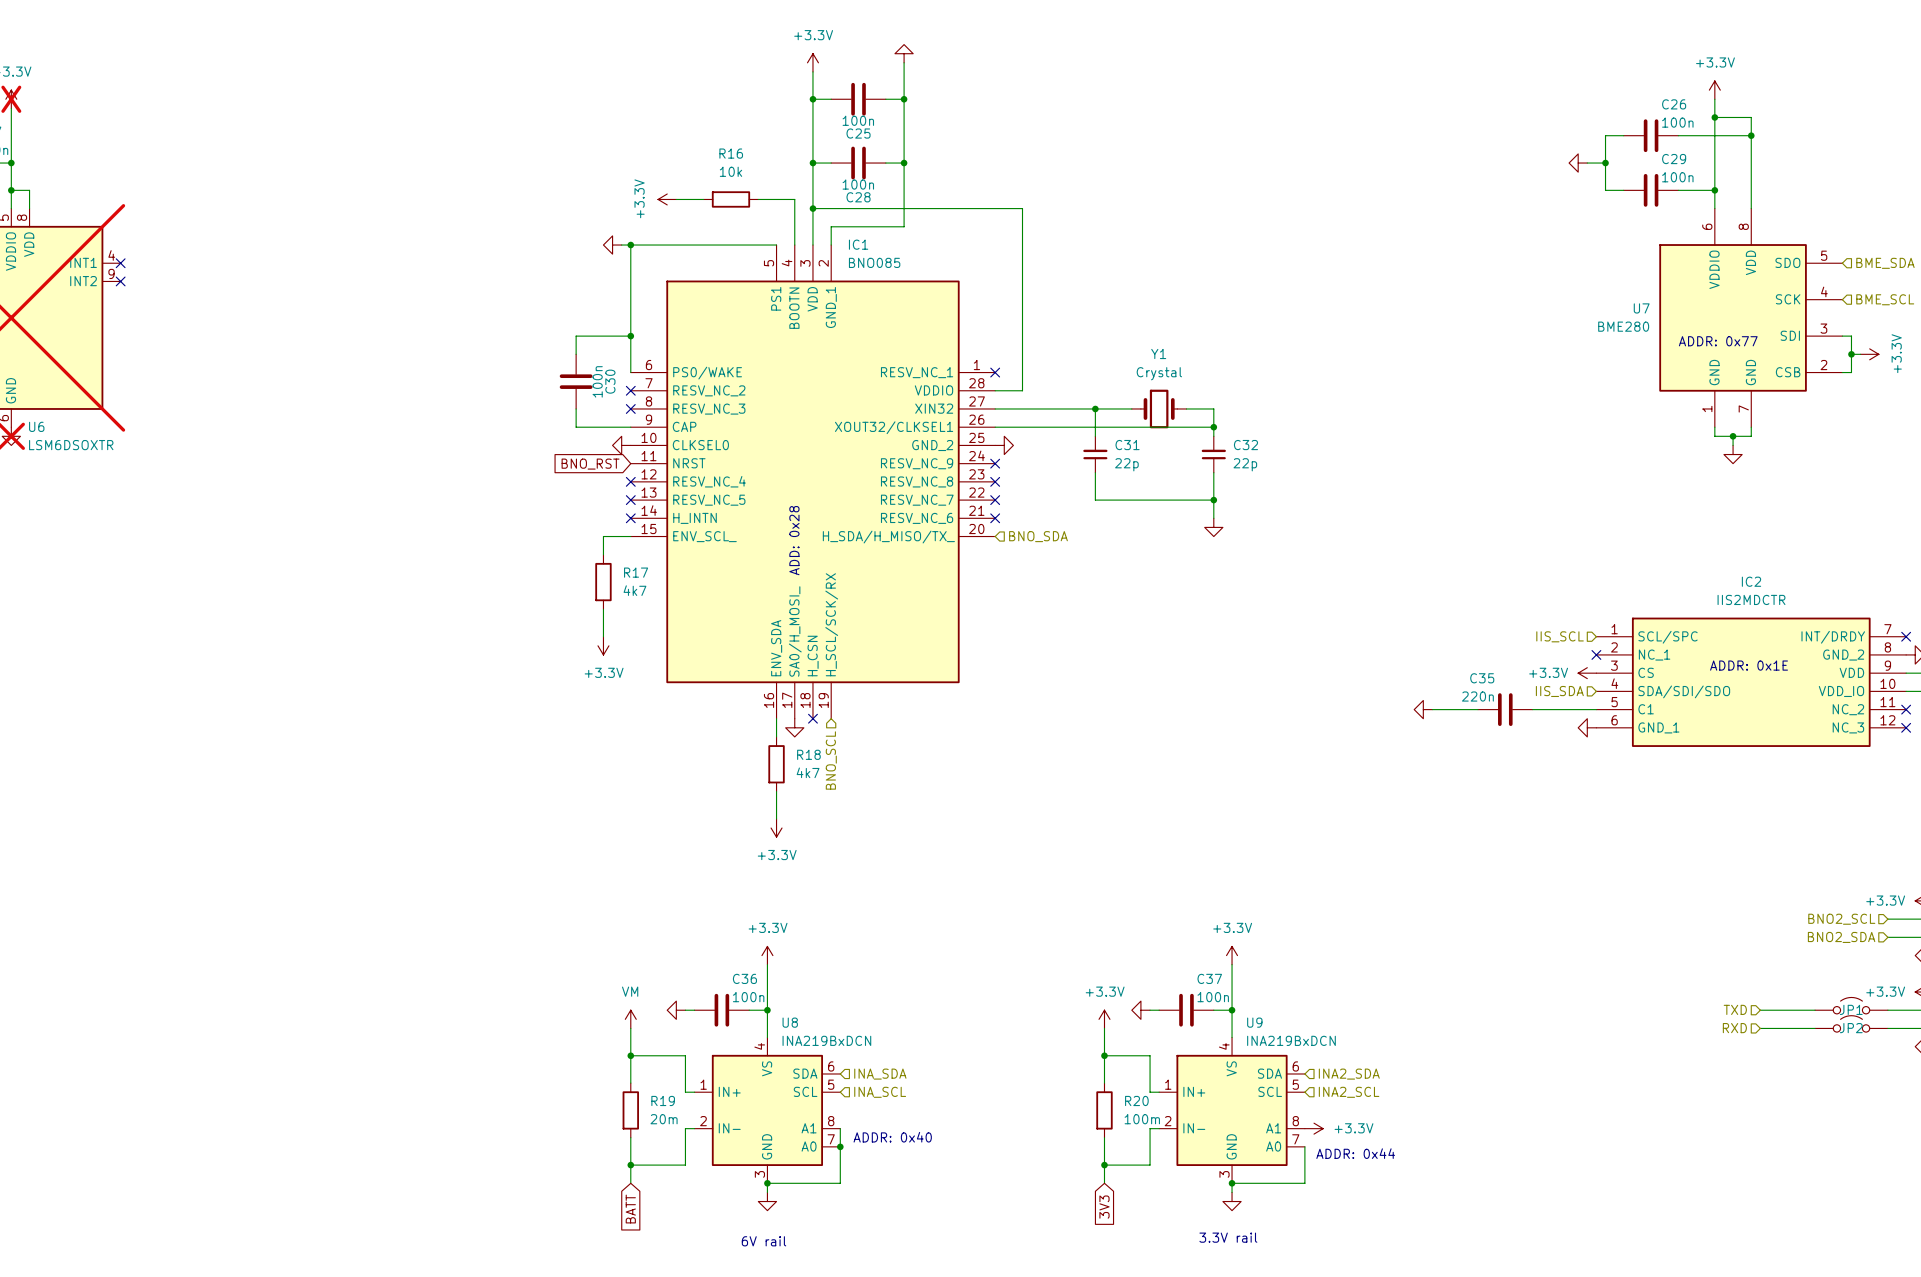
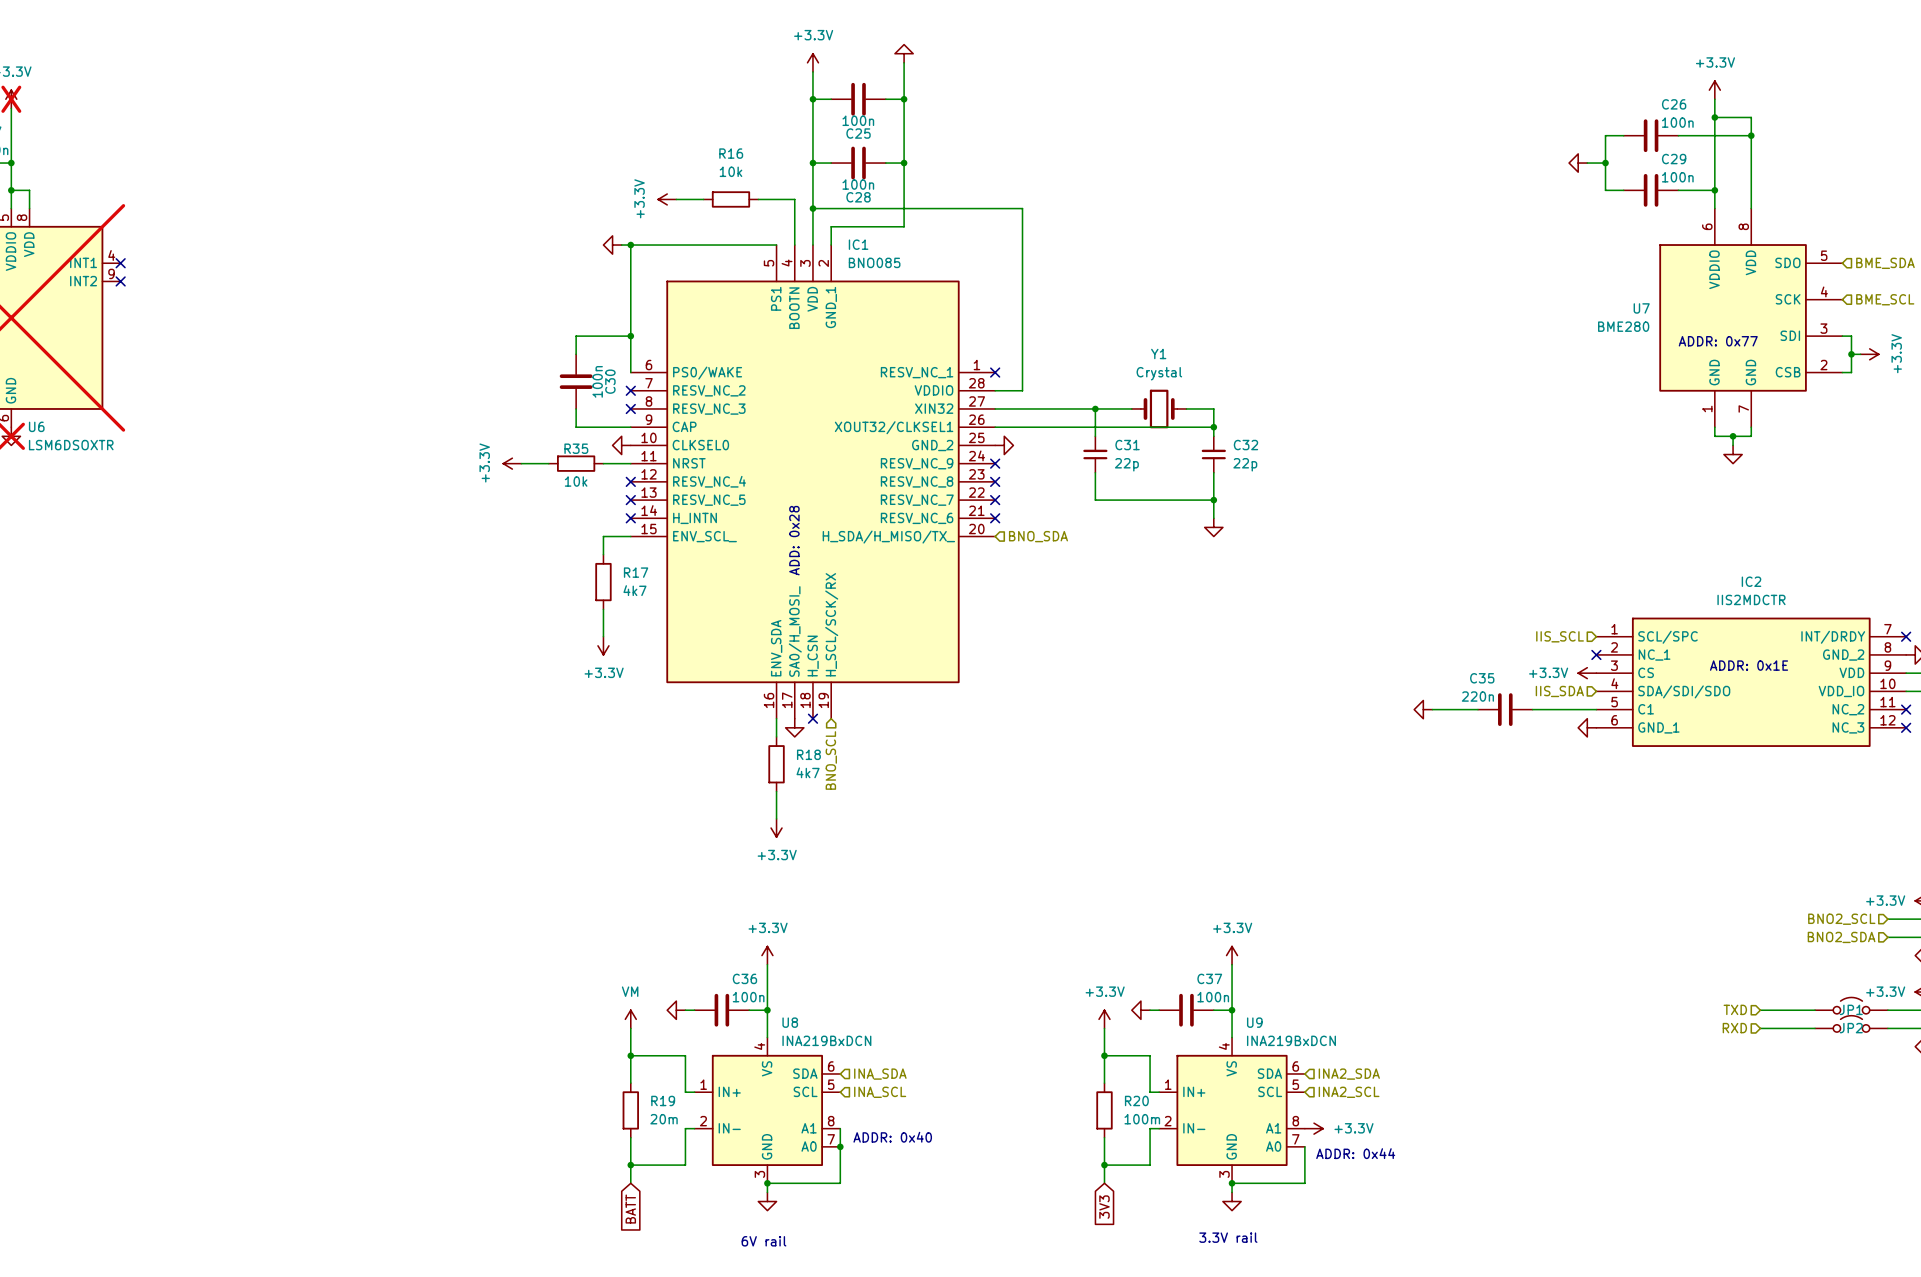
power symbol: none -> +3.3V (512, 463)
wire: none -> (521, 463) (548, 463)
R35: none -> 10k (576, 463)
wire: none -> (603, 463) (630, 463)
global label: BNO_RST (590, 464) -> none

